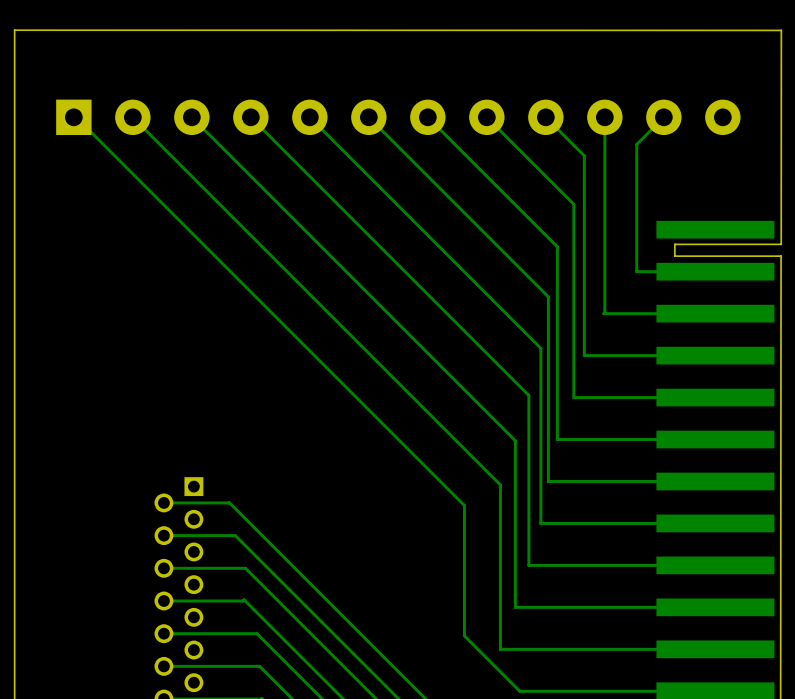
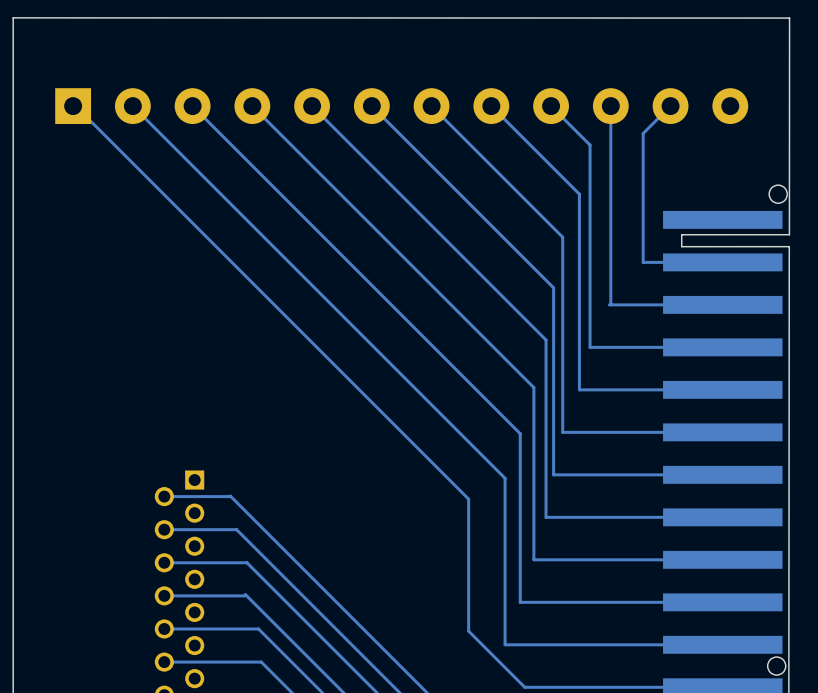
round board edge: none -> [768, 184, 788, 204]
round board edge: none -> [767, 656, 787, 676]

